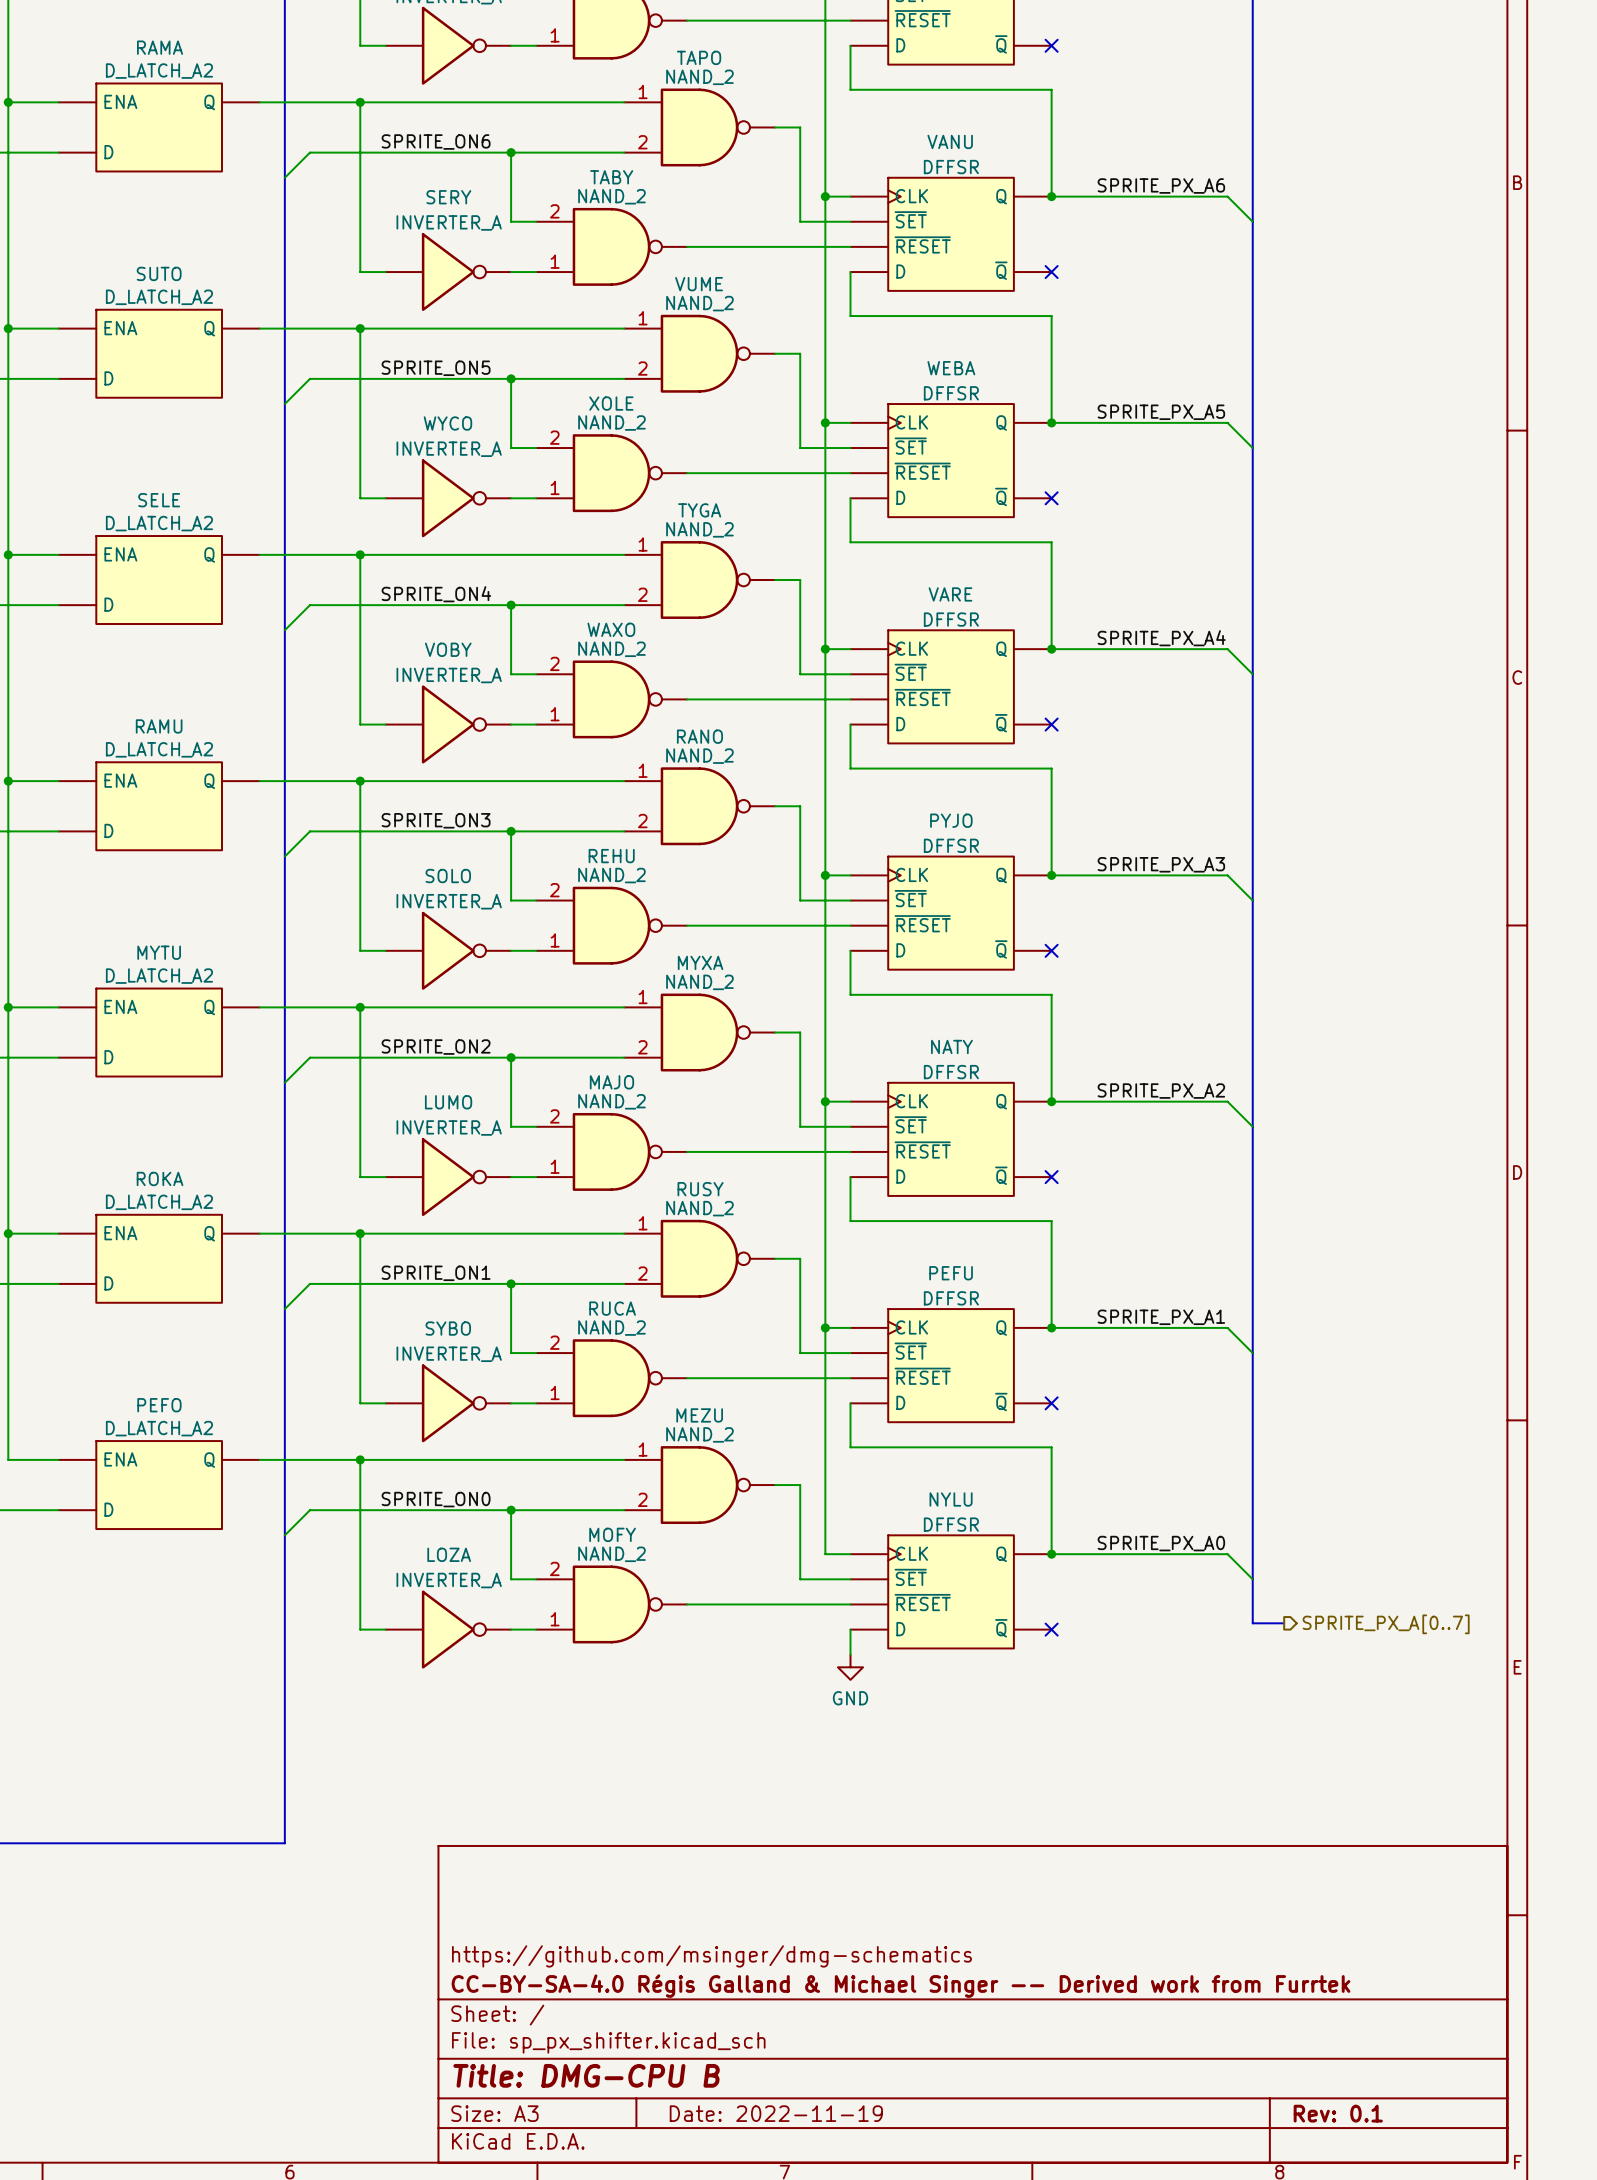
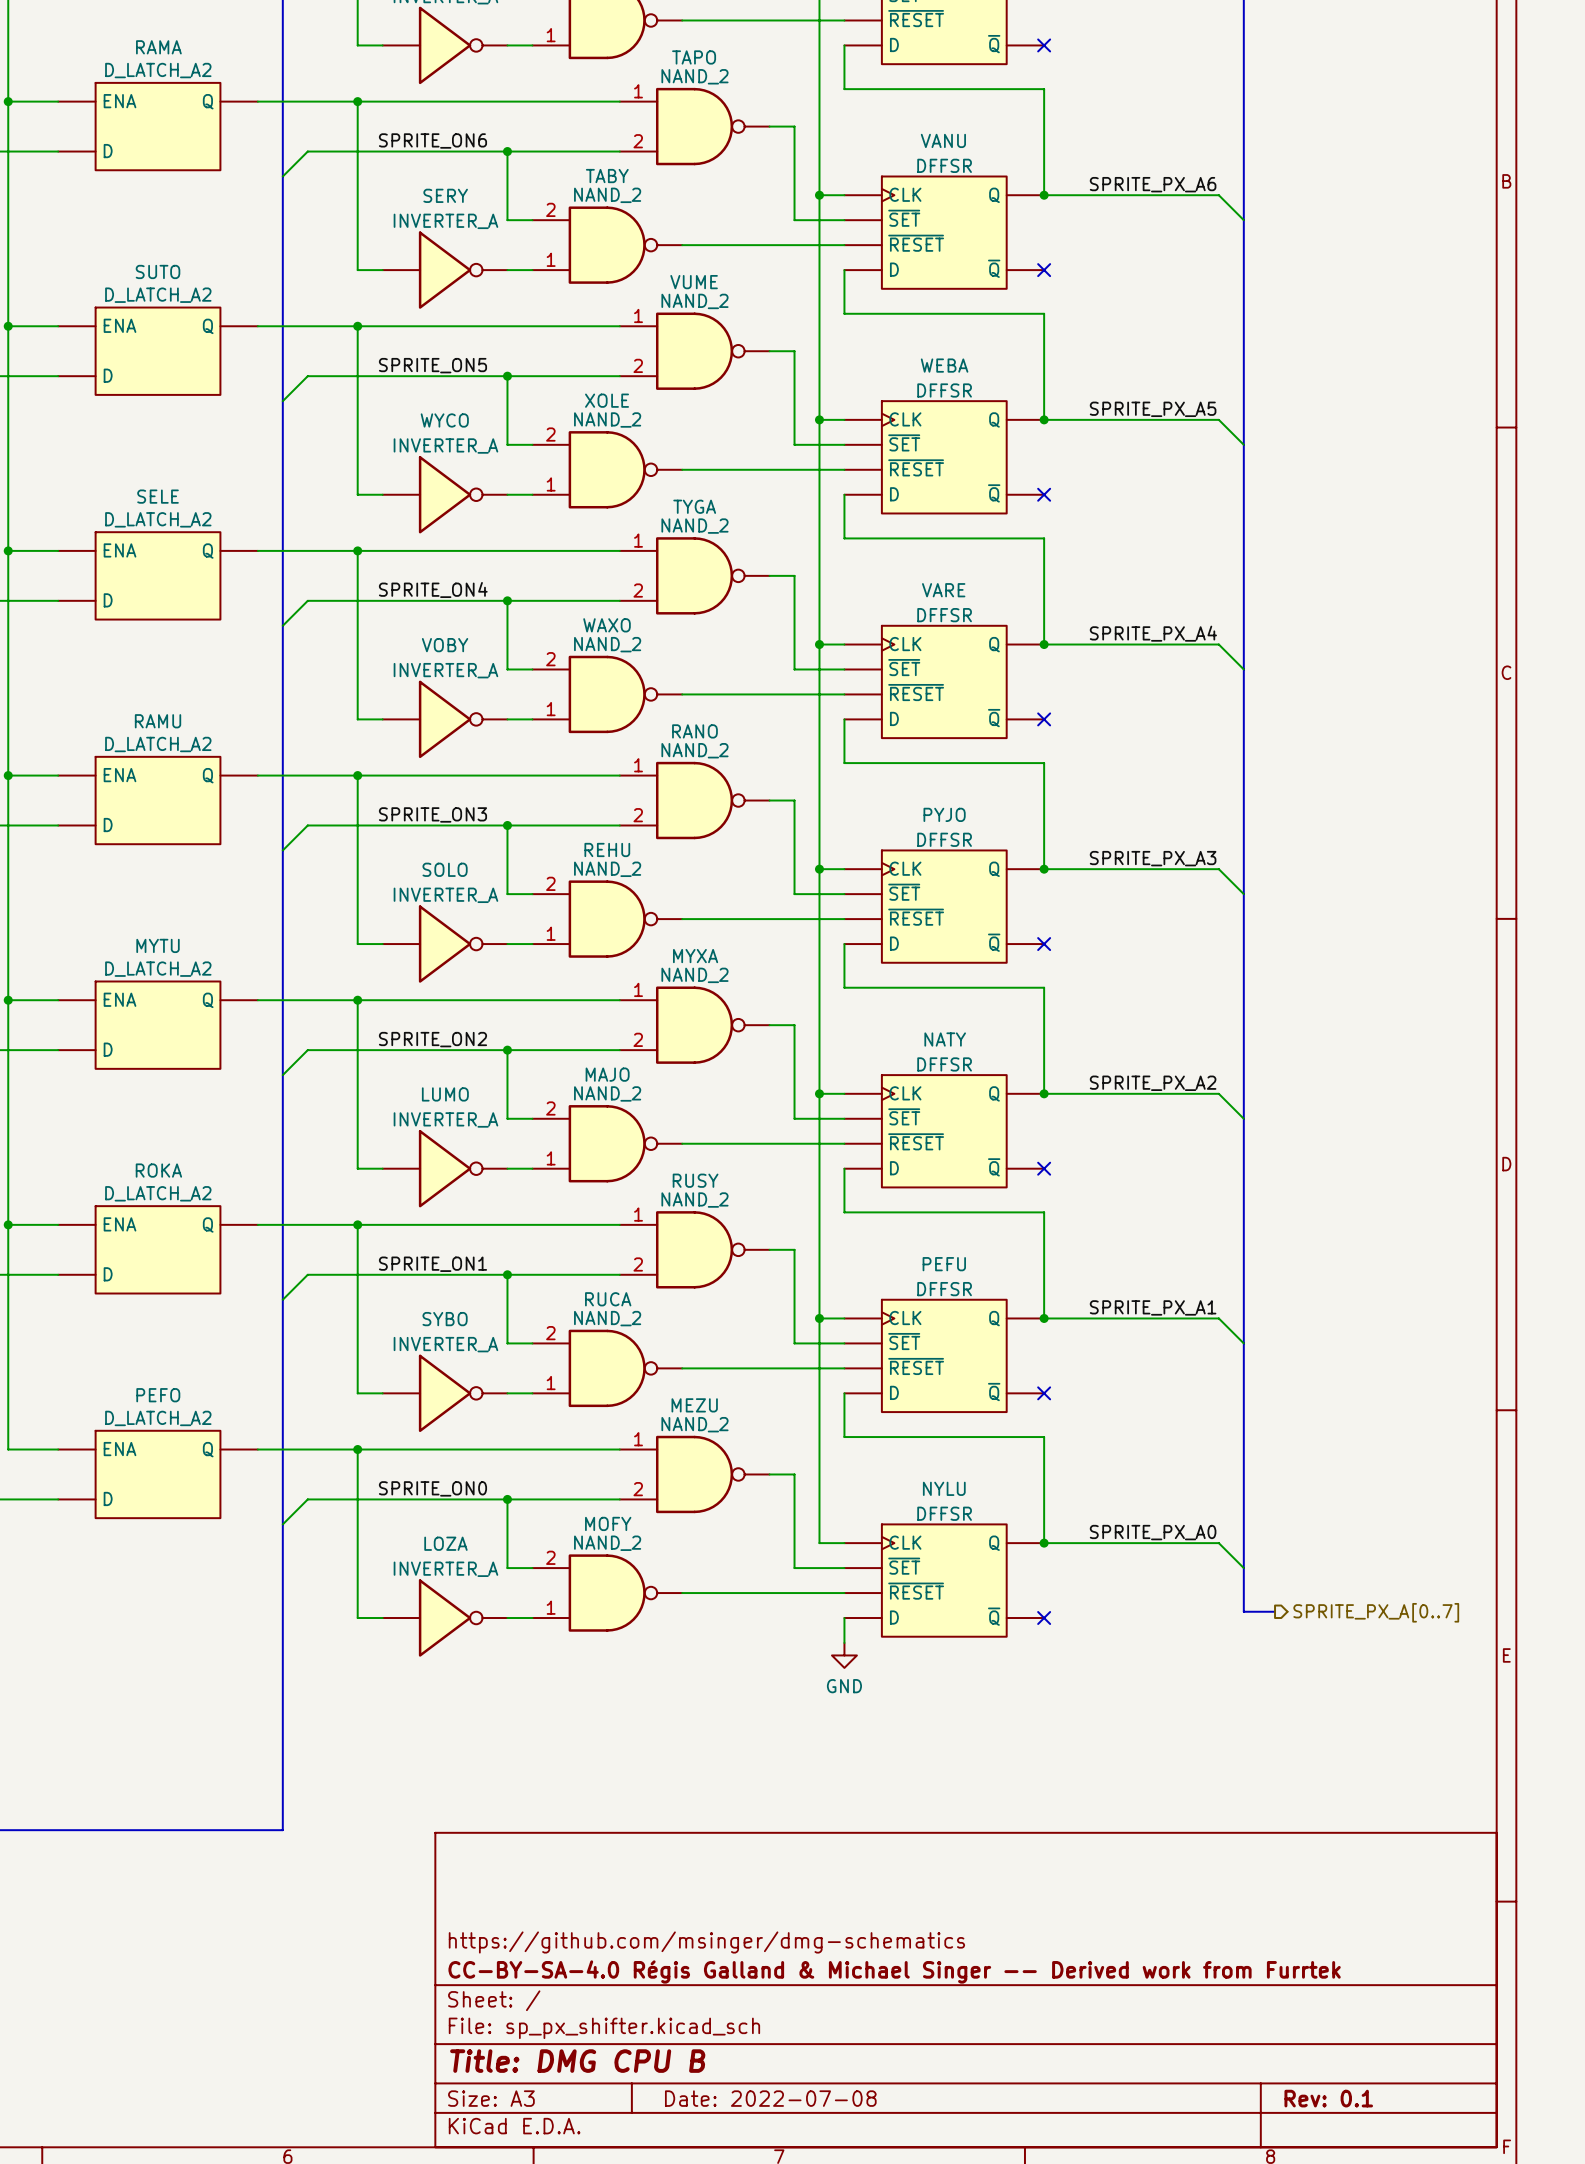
title block: Title: DMG-CPU B (586, 2075) -> Title: DMG CPU B (577, 2061)
title block: Date: 2022-11-19 (776, 2113) -> Date: 2022-07-08 (770, 2098)

